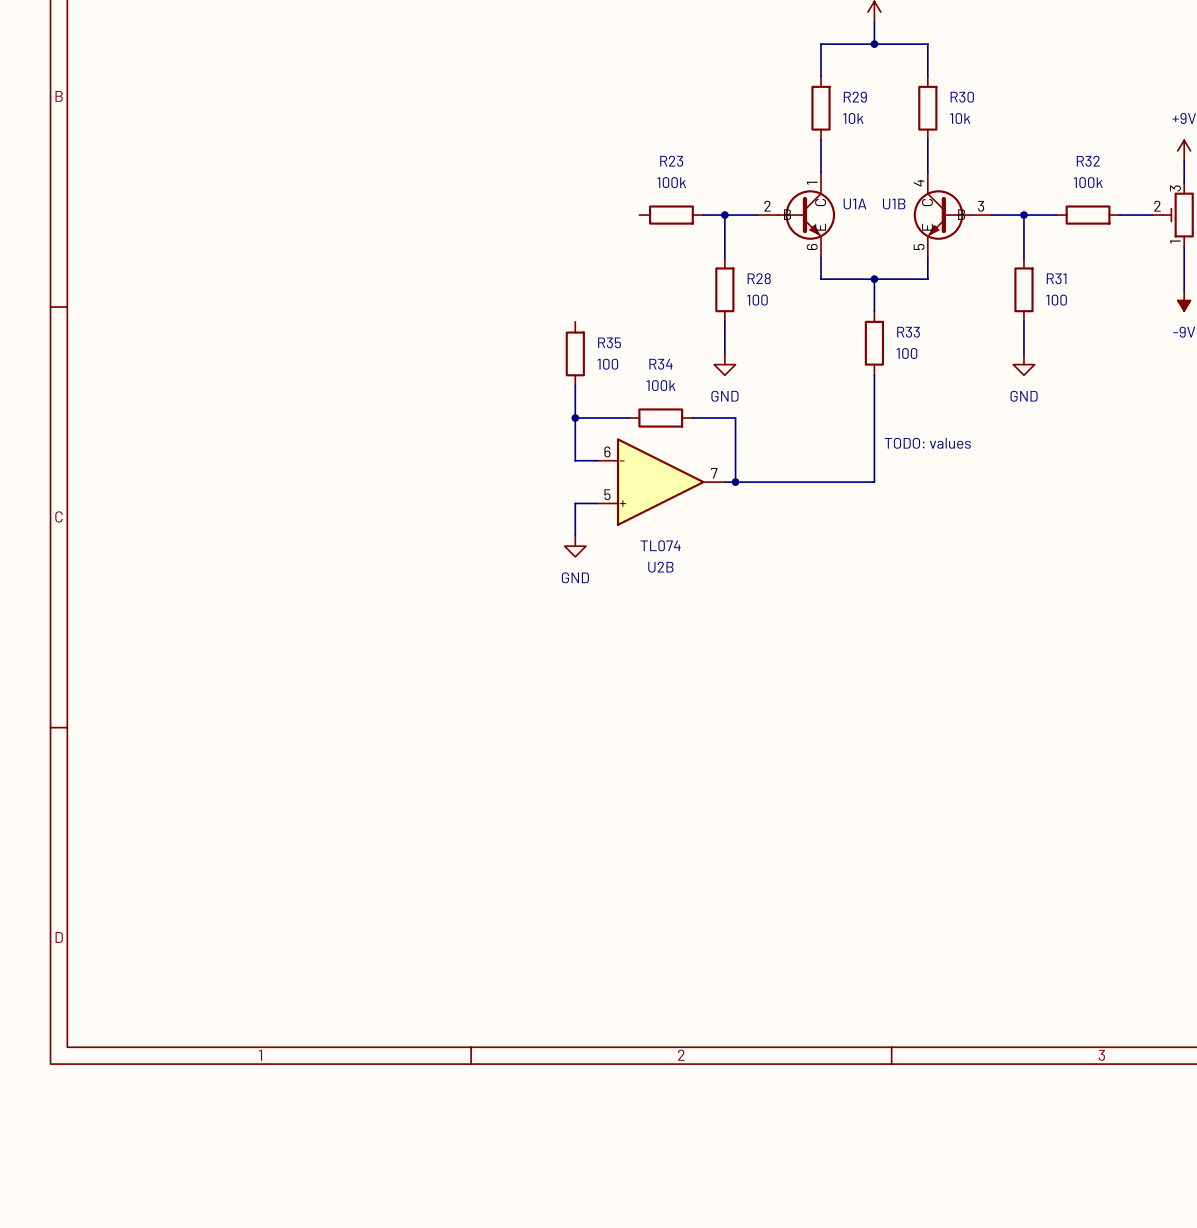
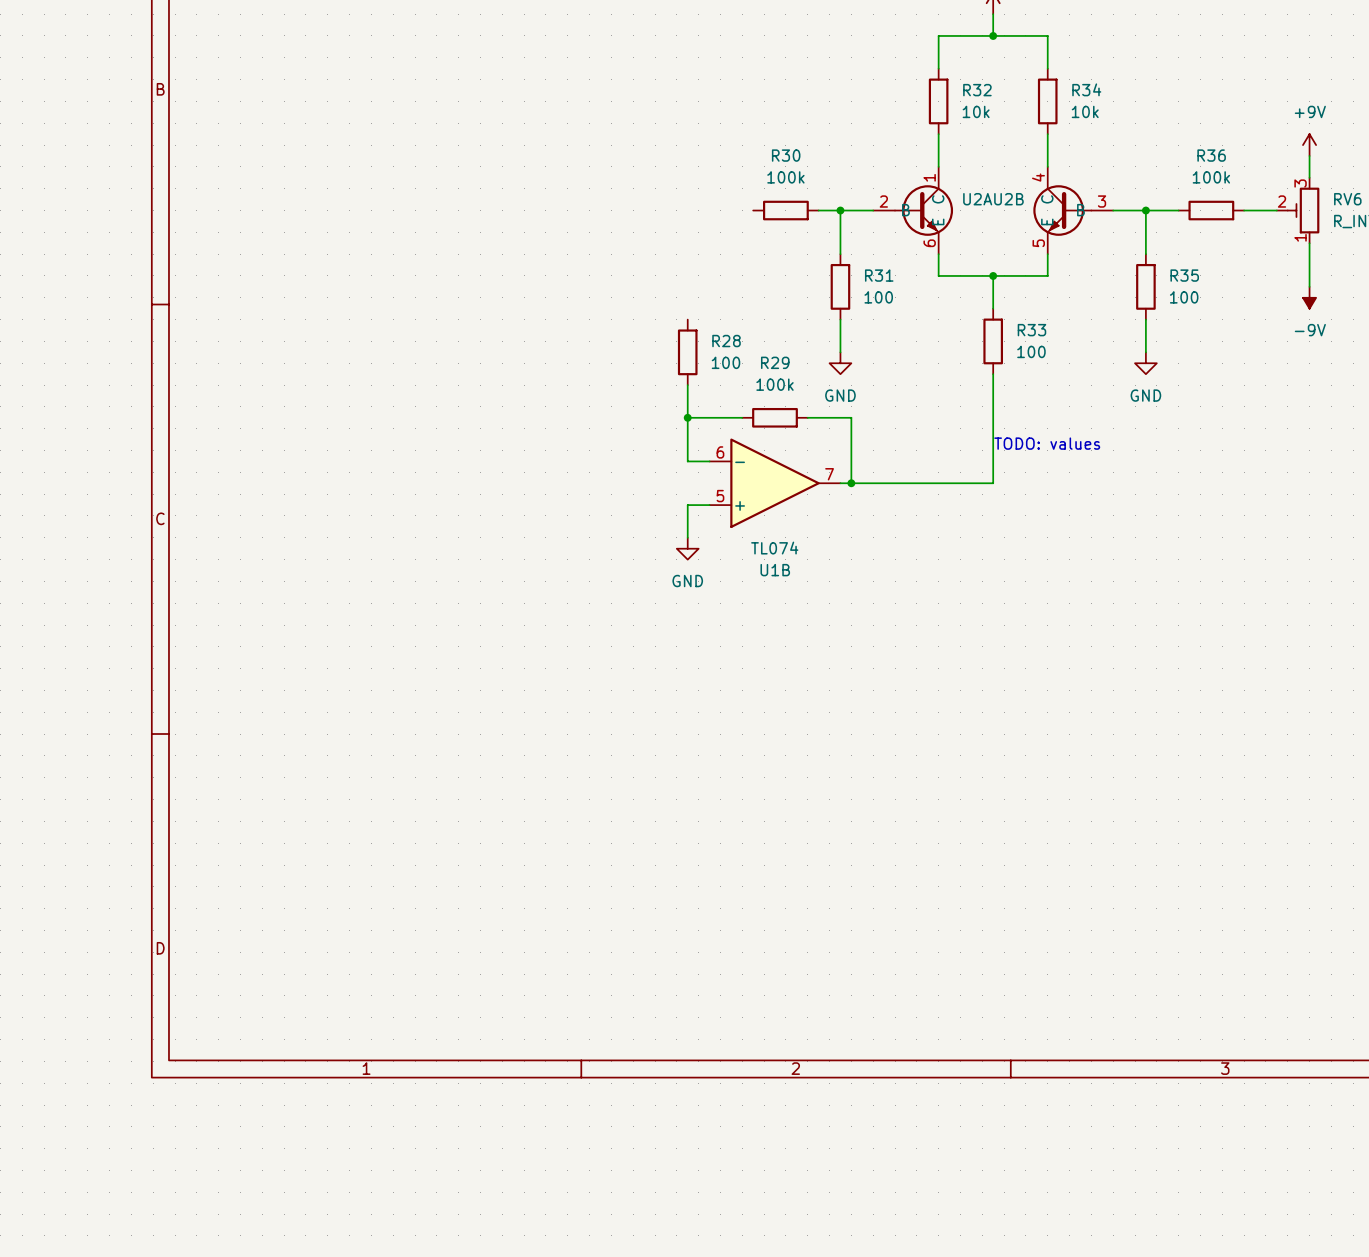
R29 name: R29 (855, 97) -> R32 (977, 90)
R30 name: R30 (962, 97) -> R34 (1086, 89)
R23 name: R23 (671, 161) -> R30 (786, 155)
R32 name: R32 (1088, 161) -> R36 (1211, 155)
U1A name: U1A (855, 204) -> U2A (977, 199)
U1B name: U1B (894, 204) -> U2B (1008, 199)
R28 name: R28 (759, 278) -> R31 (879, 275)
R31 name: R31 (1056, 278) -> R35 (1184, 275)
R35 name: R35 (609, 342) -> R28 (726, 341)
R34 name: R34 (661, 364) -> R29 (775, 362)
U2B name: U2B (660, 567) -> U1B (775, 570)

